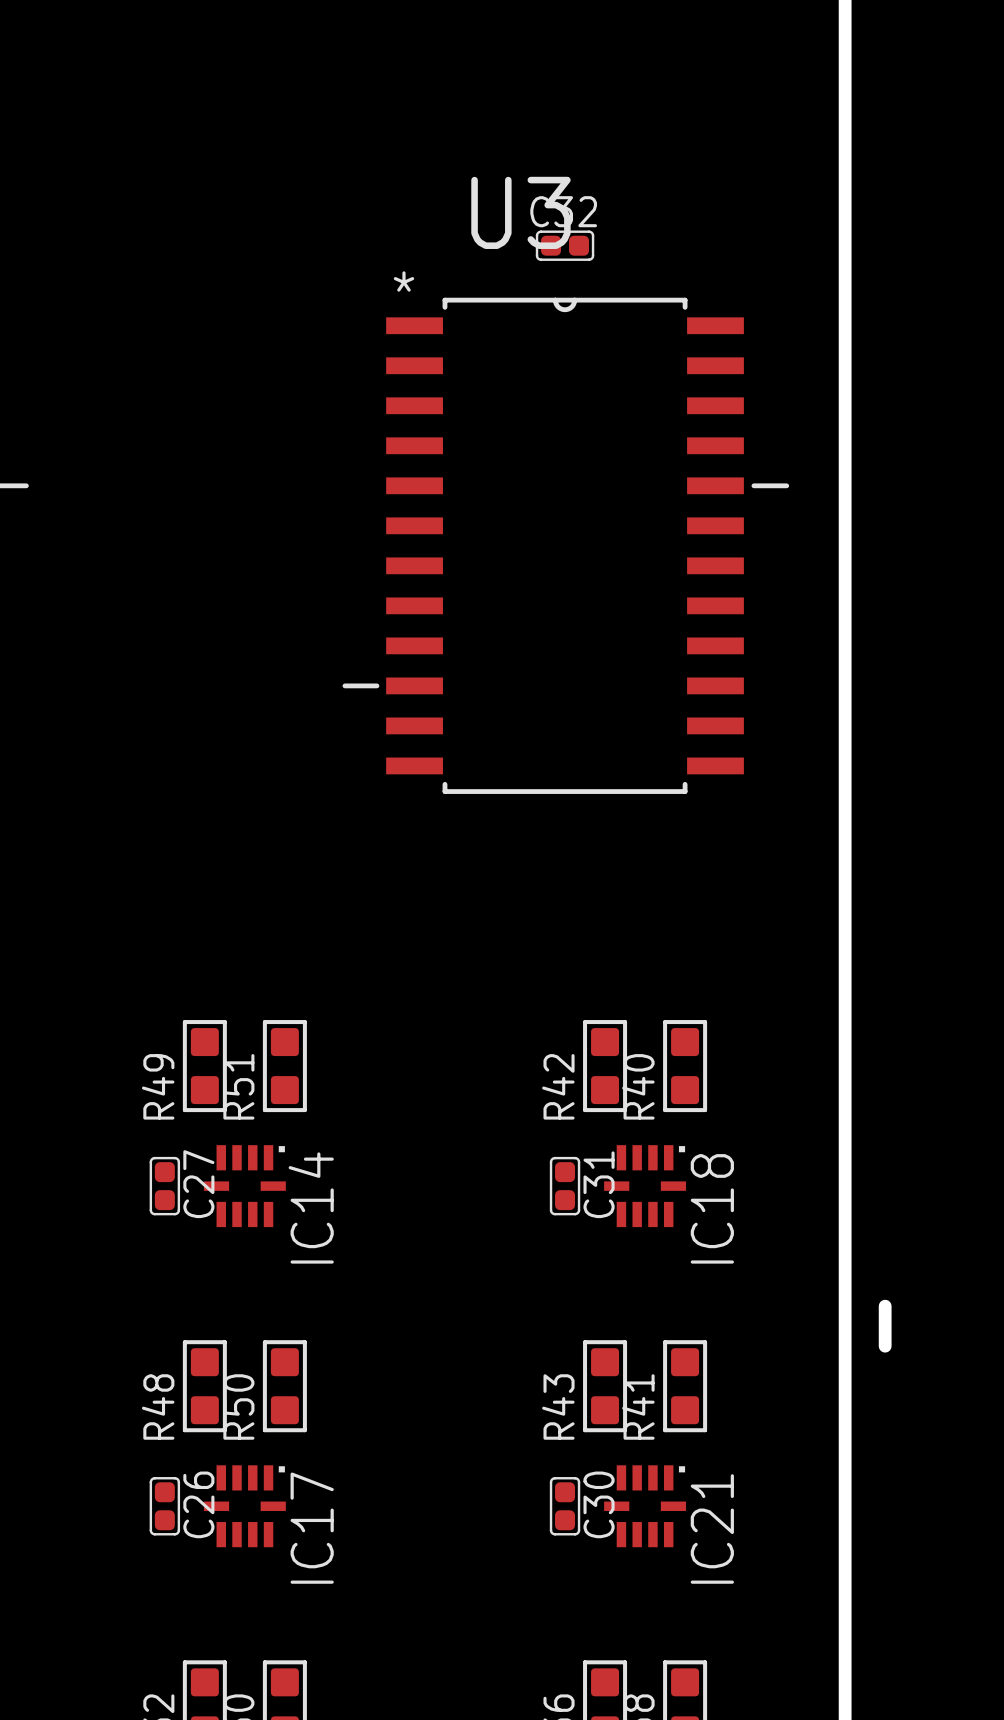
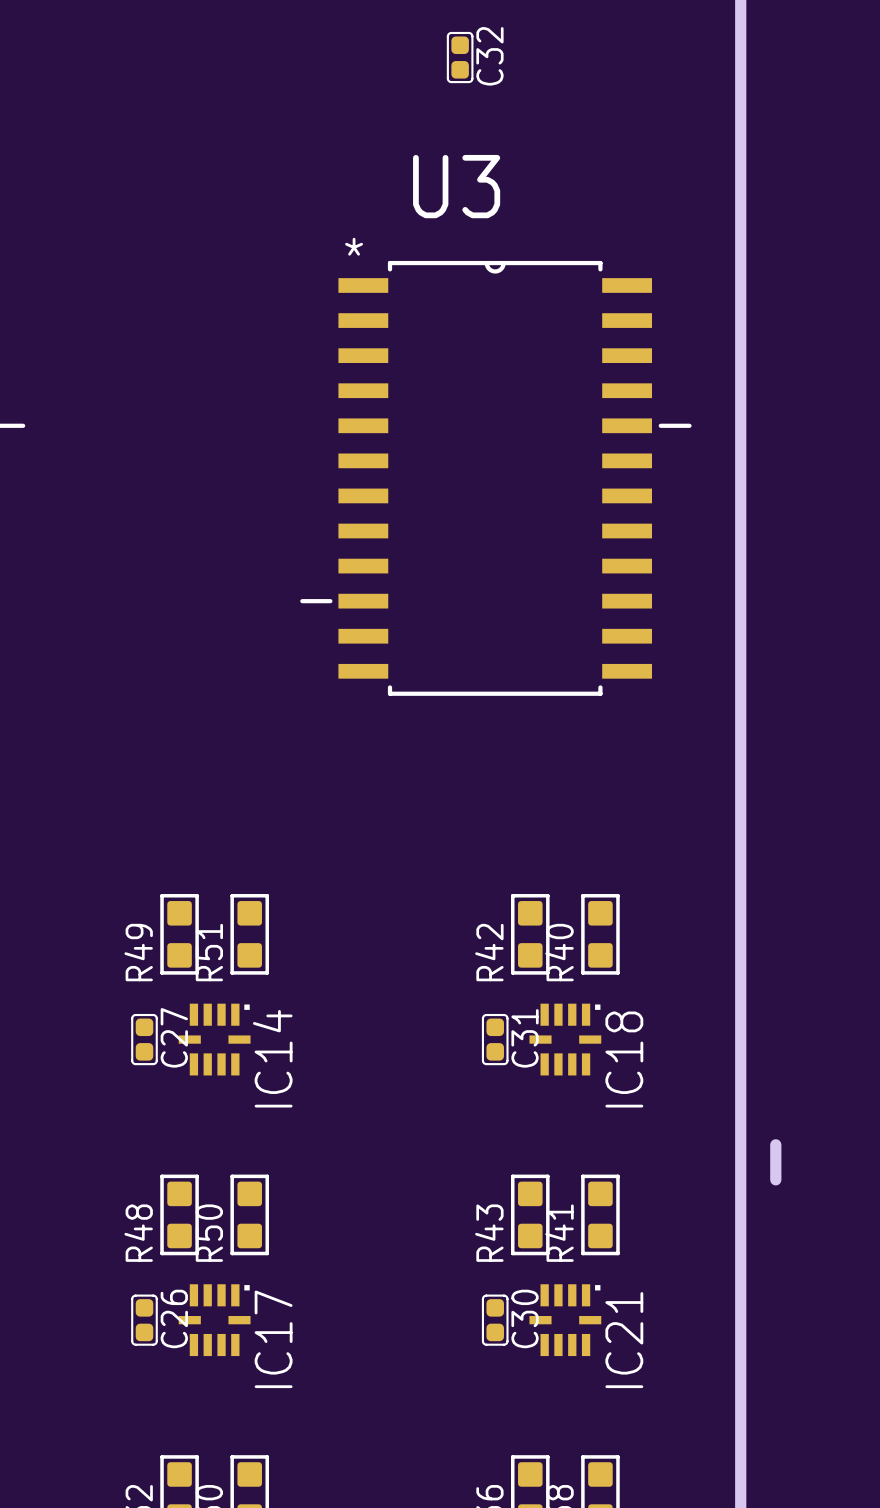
C32 rotation: 0° (565, 245) -> 90° clockwise (460, 57)
C32 position: (565, 245) -> (460, 57)

